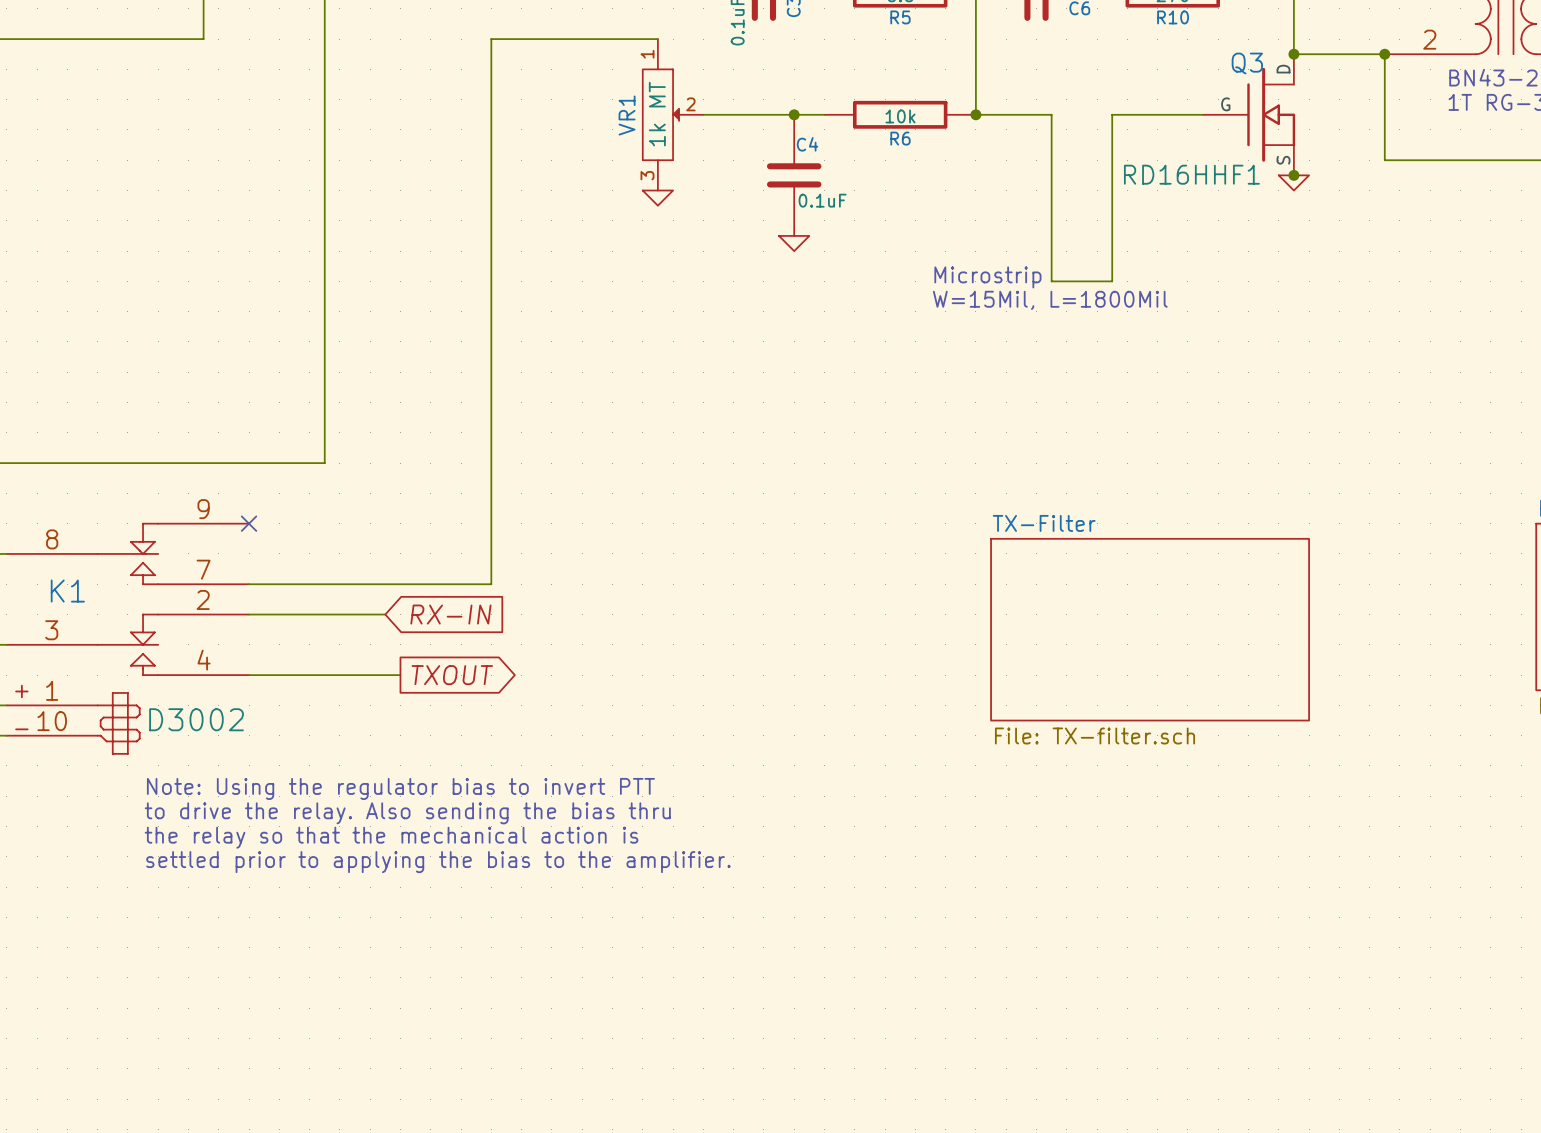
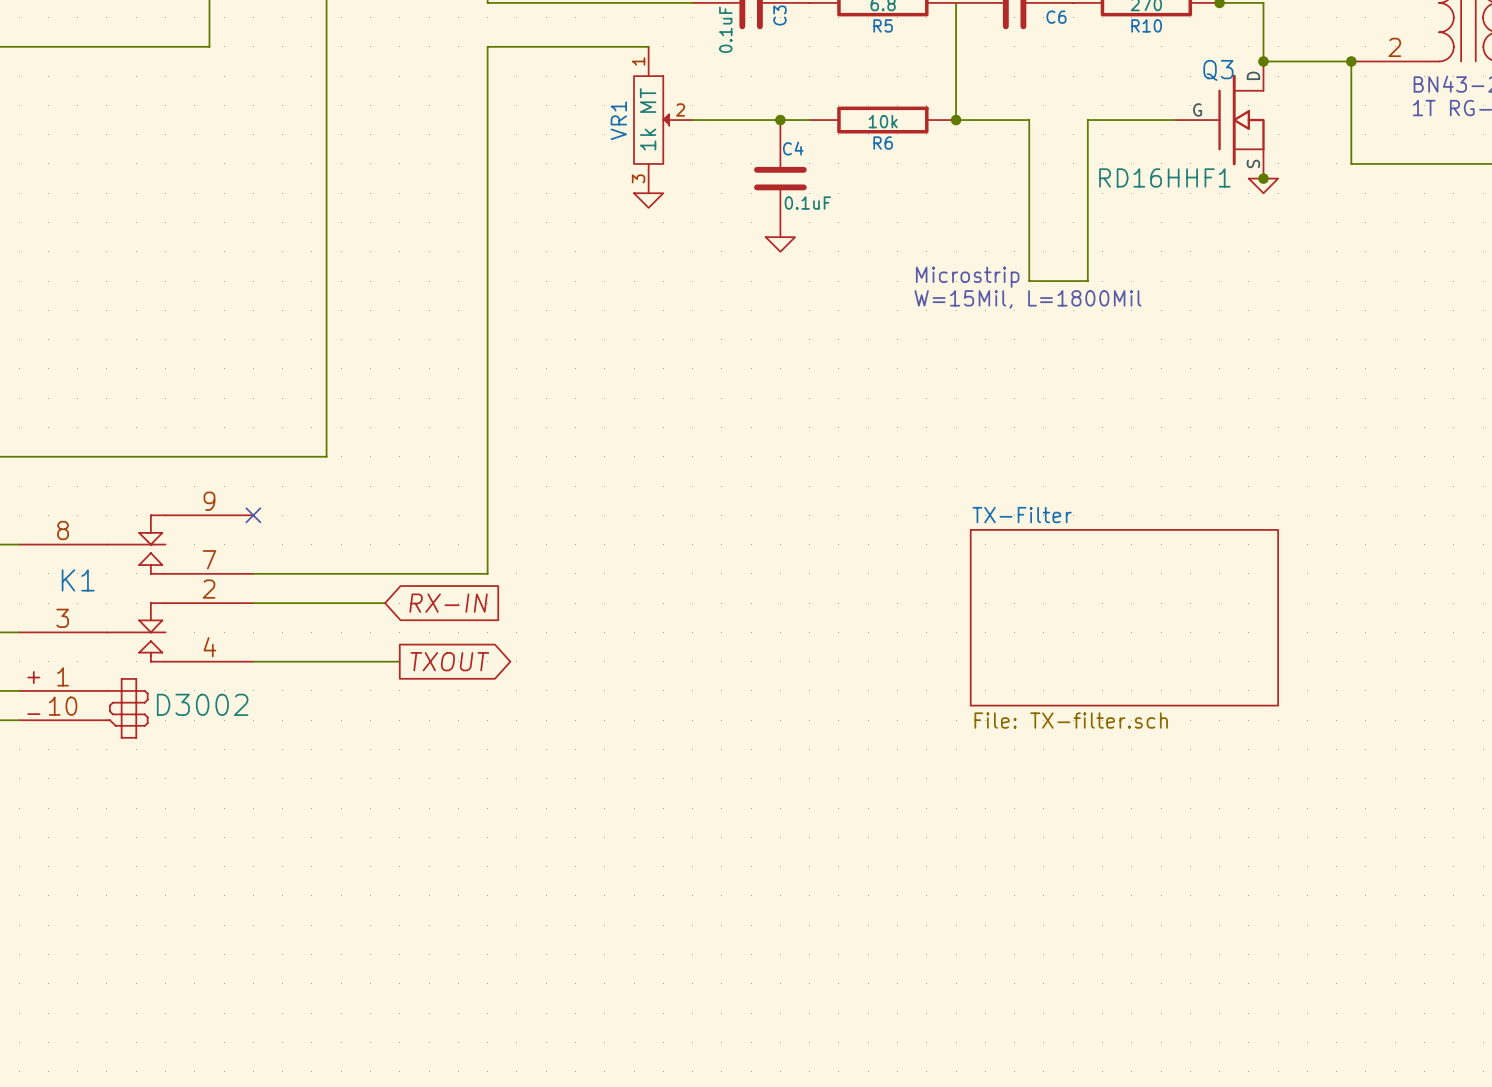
text: Note: Using the regulator bias to invert PTT (400, 788) -> none
text: to drive the relay. Also sending the bias thru (407, 813) -> none
text: the relay so that the mechanical action is (391, 837) -> none
text: settled prior to applying the bias to the amplifier. (438, 862) -> none

